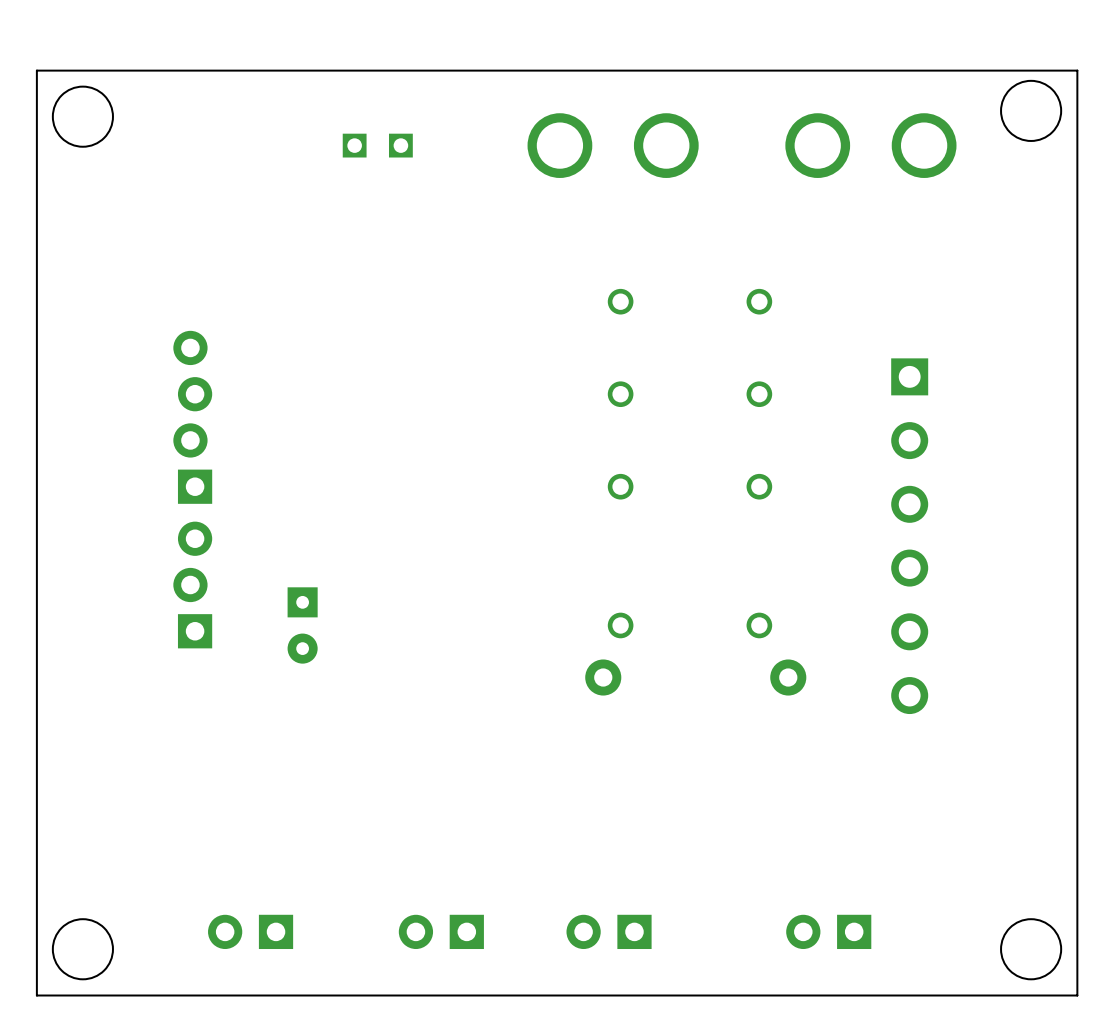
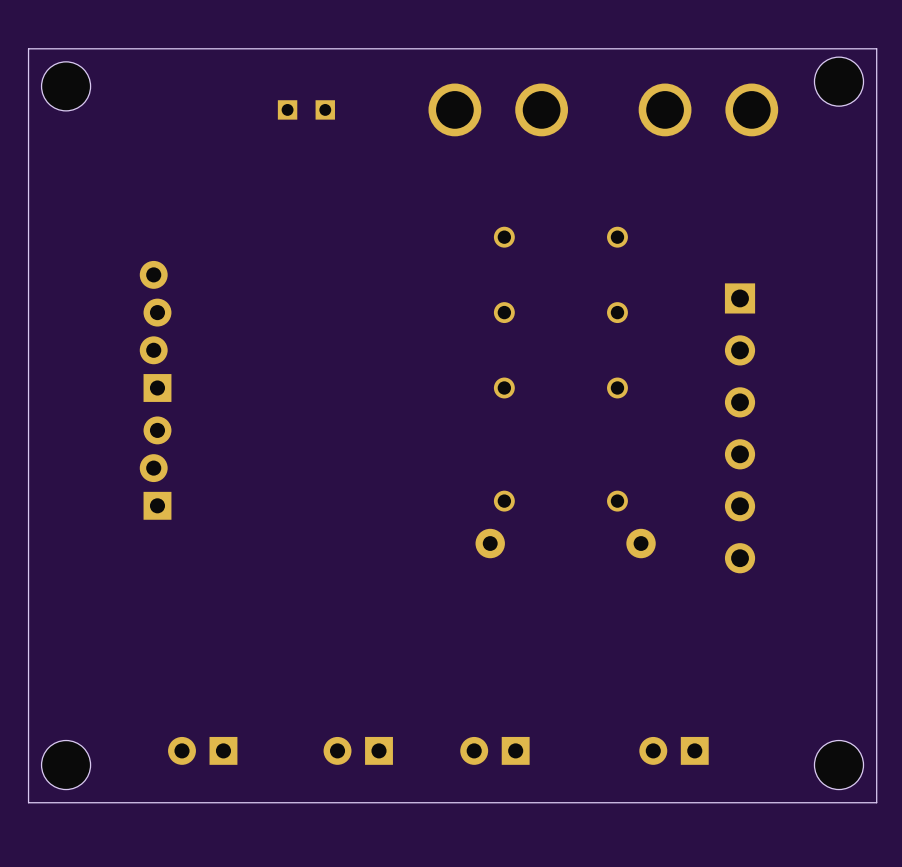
part: (302, 625) -> none

